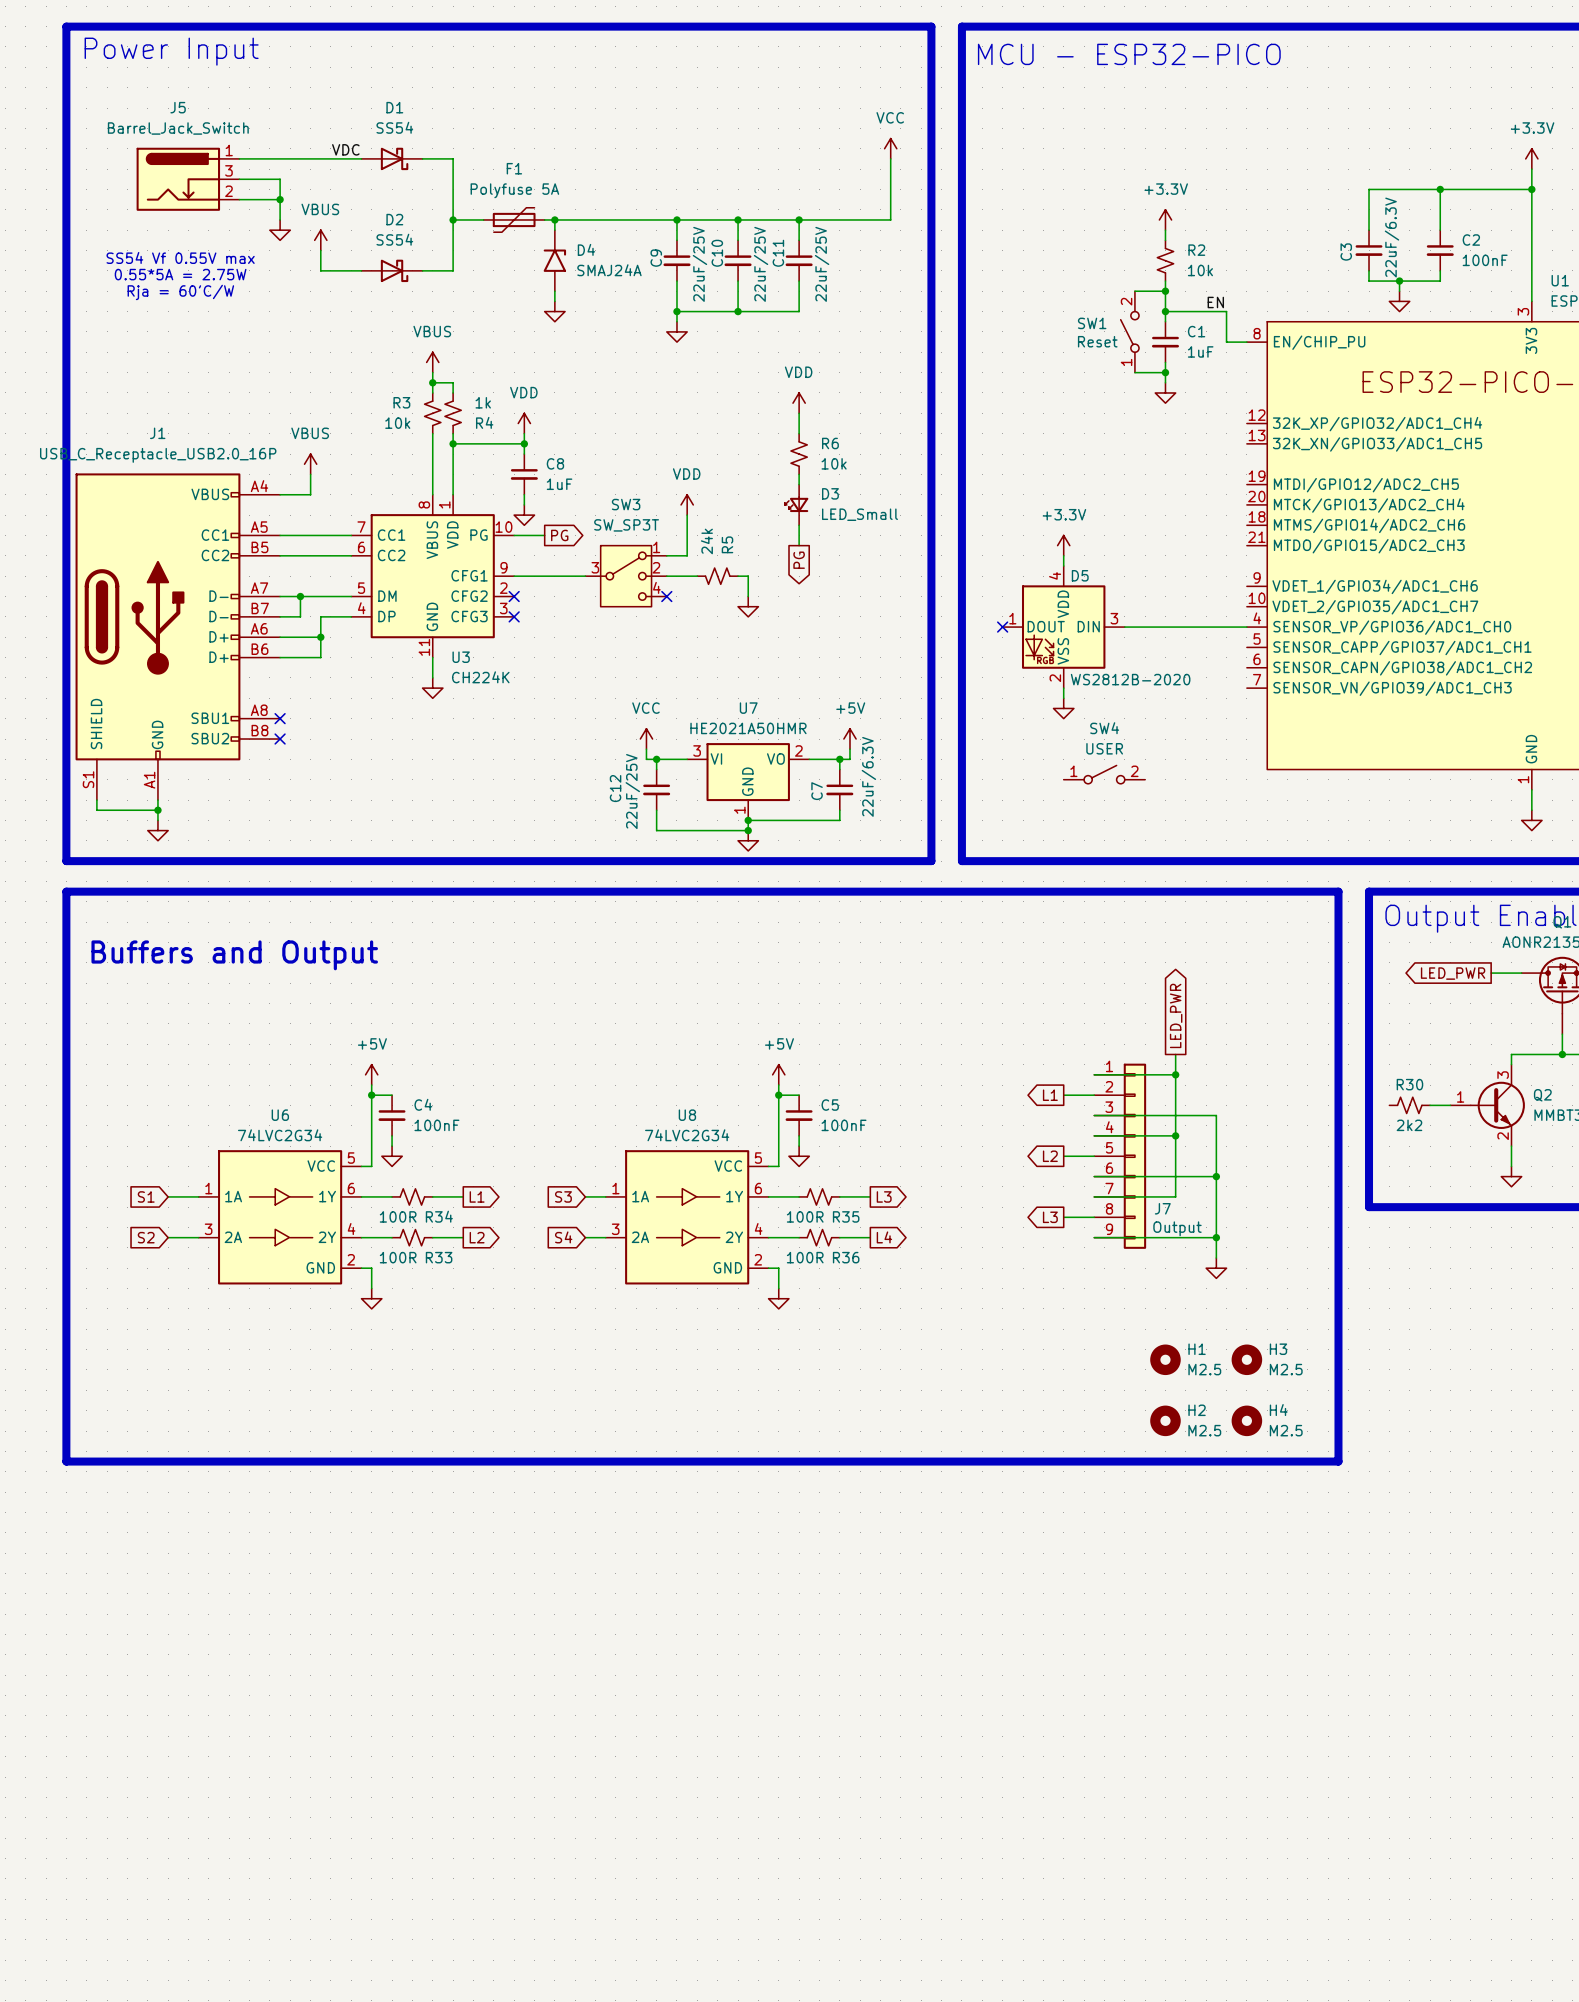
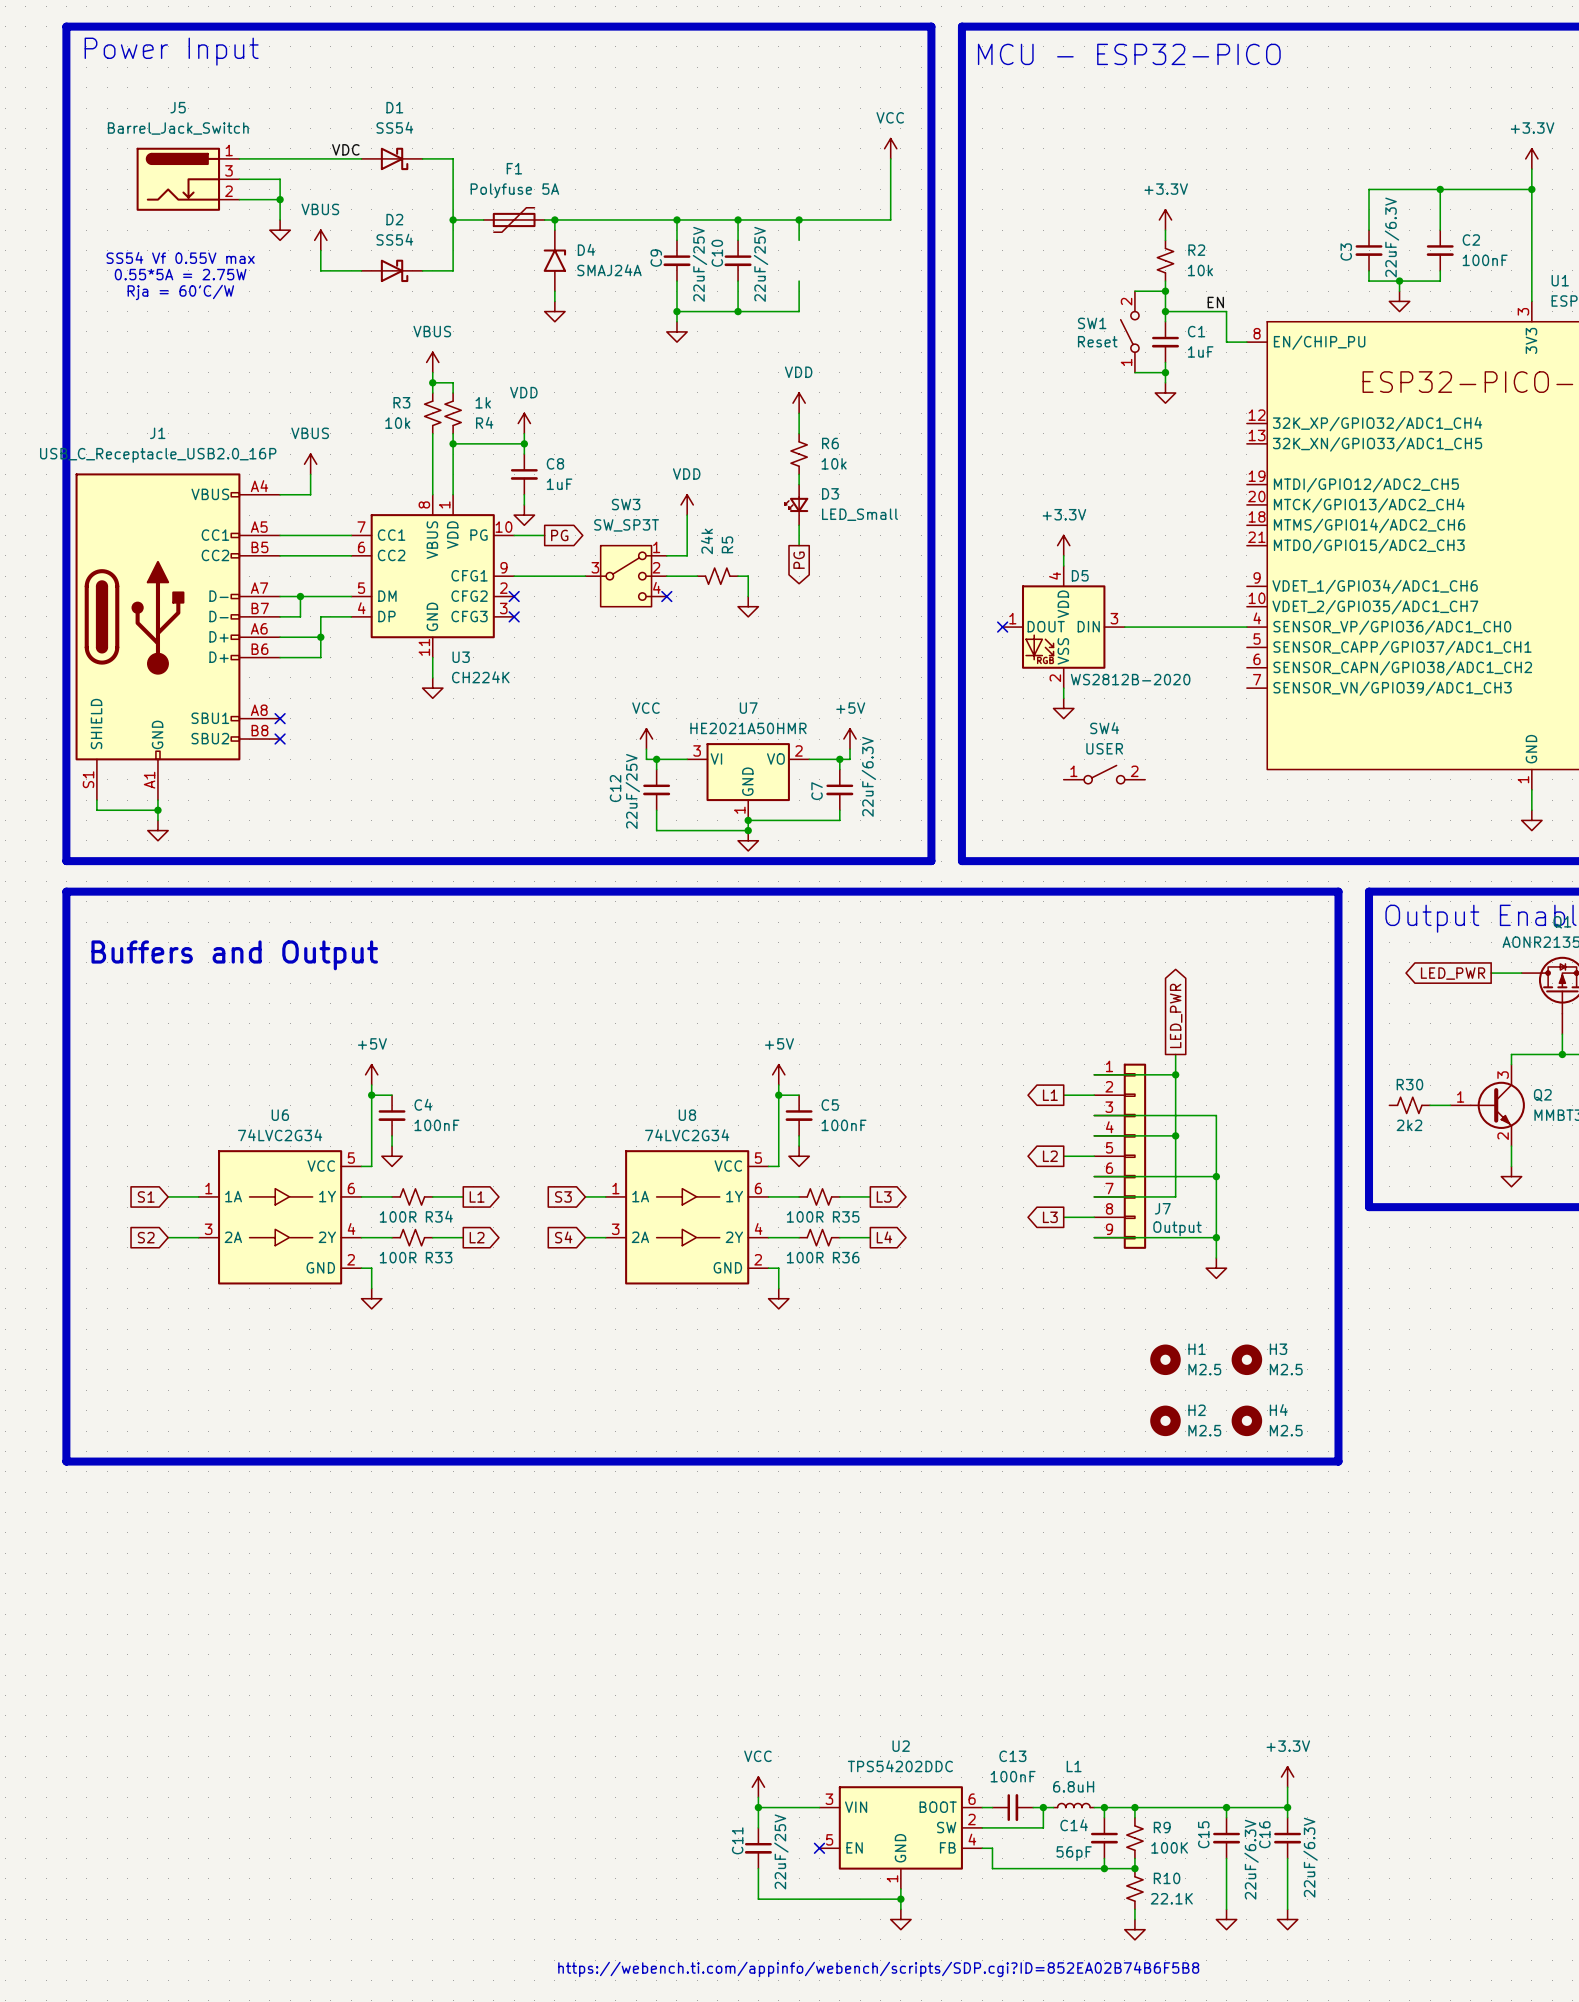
C11 position: (799, 260) -> (758, 1848)
power symbol: none -> +3.3V (1287, 1777)
power symbol: none -> VCC (758, 1787)
wire: none -> (1287, 1787) (1287, 1817)
wire: none -> (758, 1797) (758, 1827)
L1: none -> 6.8uH (1073, 1805)
wire: none -> (758, 1807) (819, 1807)
junction: none -> (758, 1807)
wire: none -> (982, 1807) (992, 1807)
C13: none -> 100nF (1012, 1807)
wire: none -> (1033, 1807) (1053, 1807)
wire: none -> (1043, 1807) (1043, 1827) (982, 1827)
junction: none -> (1043, 1807)
wire: none -> (1094, 1807) (1287, 1807)
wire: none -> (1104, 1807) (1104, 1817)
junction: none -> (1104, 1807)
wire: none -> (1134, 1807) (1134, 1817)
junction: none -> (1134, 1807)
wire: none -> (1226, 1807) (1226, 1817)
junction: none -> (1226, 1807)
junction: none -> (1287, 1807)
U2: none -> TPS54202DDC (900, 1837)
C14: none -> 56pF (1104, 1838)
R9: none -> 100K (1134, 1838)
C15: none -> 22uF/6.3V (1226, 1838)
C16: none -> 22uF/6.3V (1287, 1838)
no-connect mark: none -> (819, 1848)
wire: none -> (982, 1848) (992, 1848) (992, 1868) (1134, 1868) (1134, 1858)
wire: none -> (1104, 1858) (1104, 1868)
wire: none -> (1226, 1858) (1226, 1909)
wire: none -> (1287, 1858) (1287, 1909)
wire: none -> (758, 1868) (758, 1899) (900, 1899)
junction: none -> (1104, 1868)
junction: none -> (1134, 1868)
wire: none -> (900, 1888) (900, 1909)
R10: none -> 22.1K (1134, 1888)
junction: none -> (900, 1899)
wire: none -> (1134, 1909) (1134, 1919)
power symbol: none -> (900, 1919)
power symbol: none -> (1226, 1919)
power symbol: none -> (1287, 1919)
power symbol: none -> (1134, 1929)
text: none -> https://webench.ti.com/appinfo/webench/scripts/SDP.cgi?ID=852EA02B74B6F5B8 (878, 1969)

